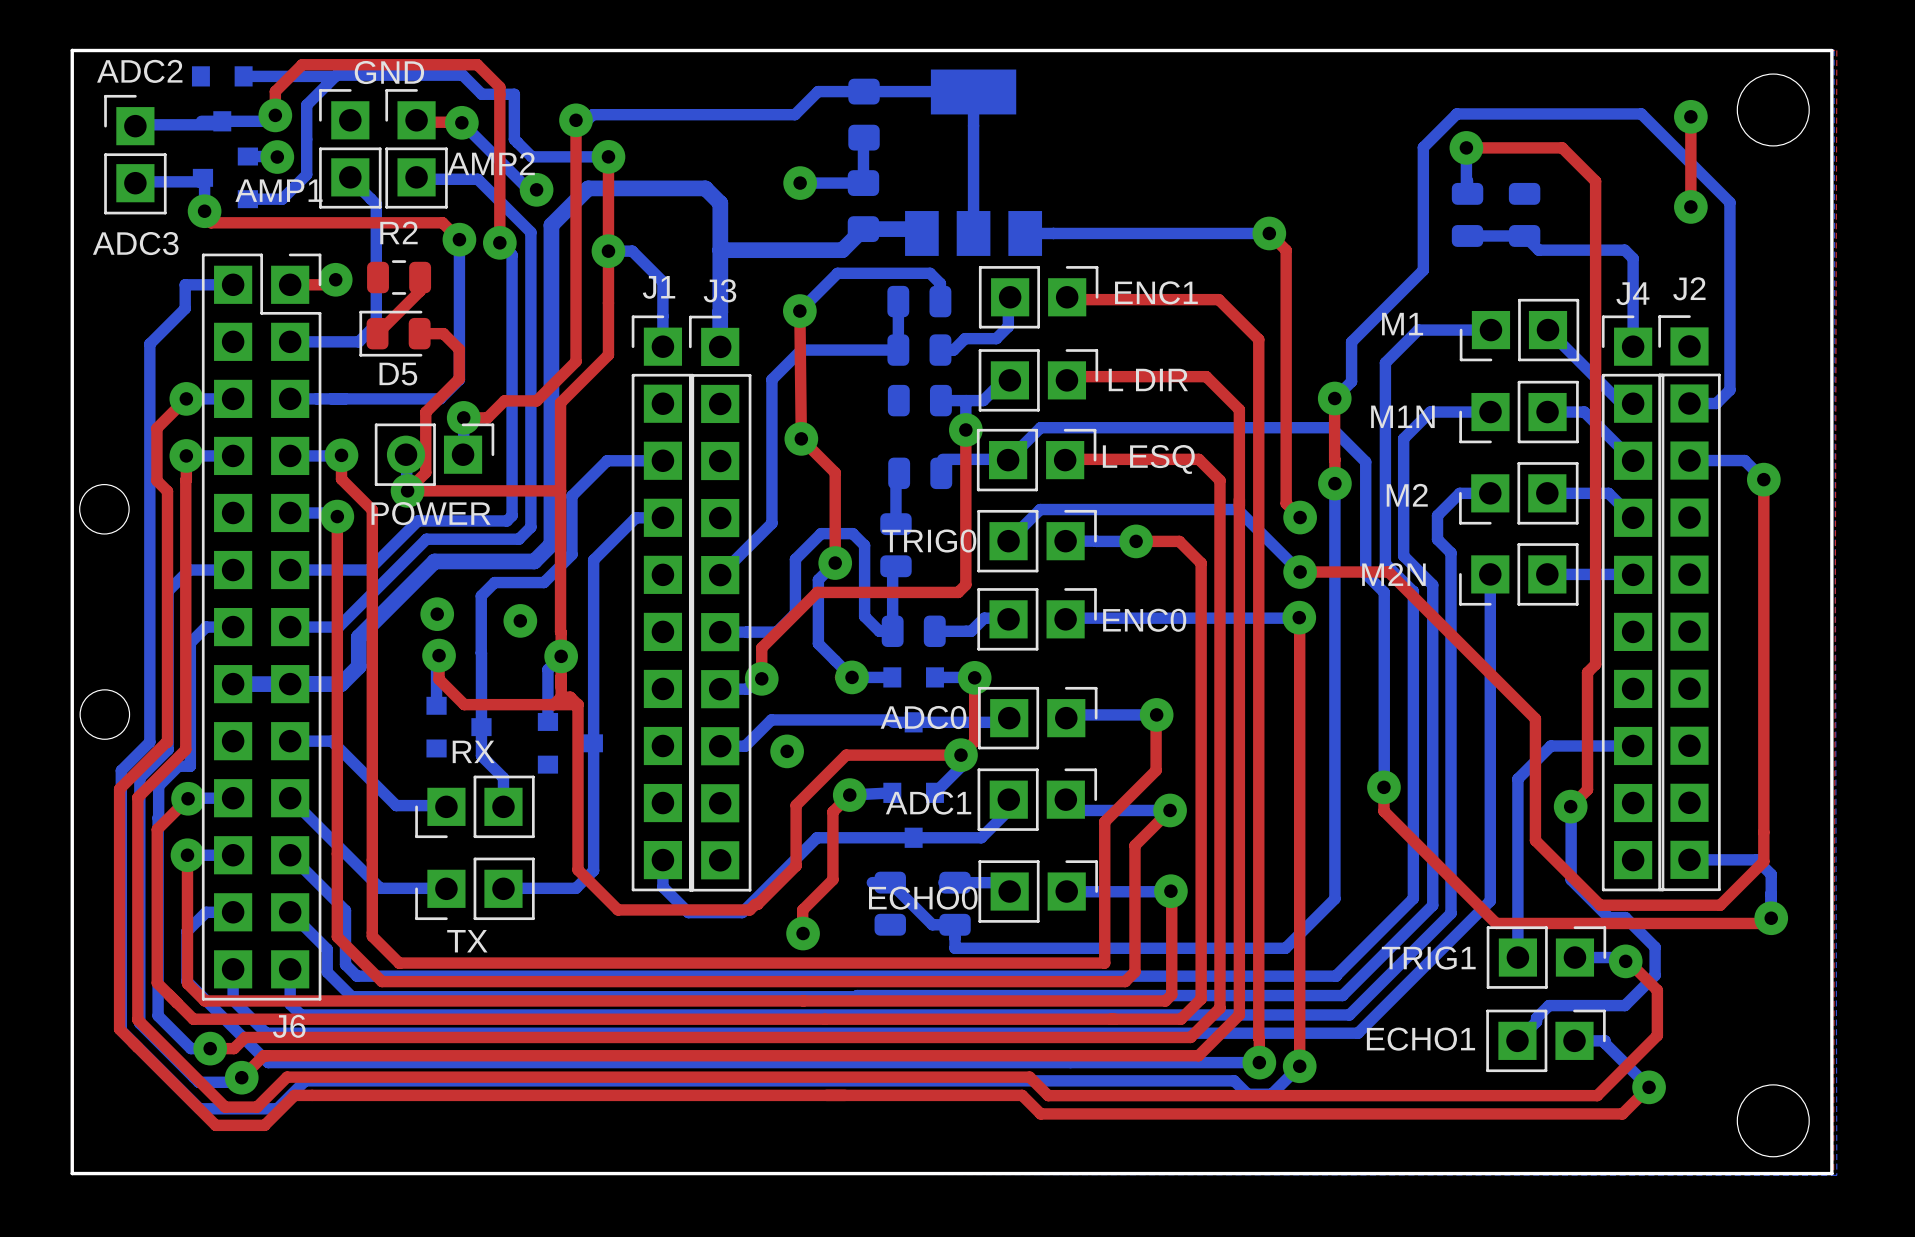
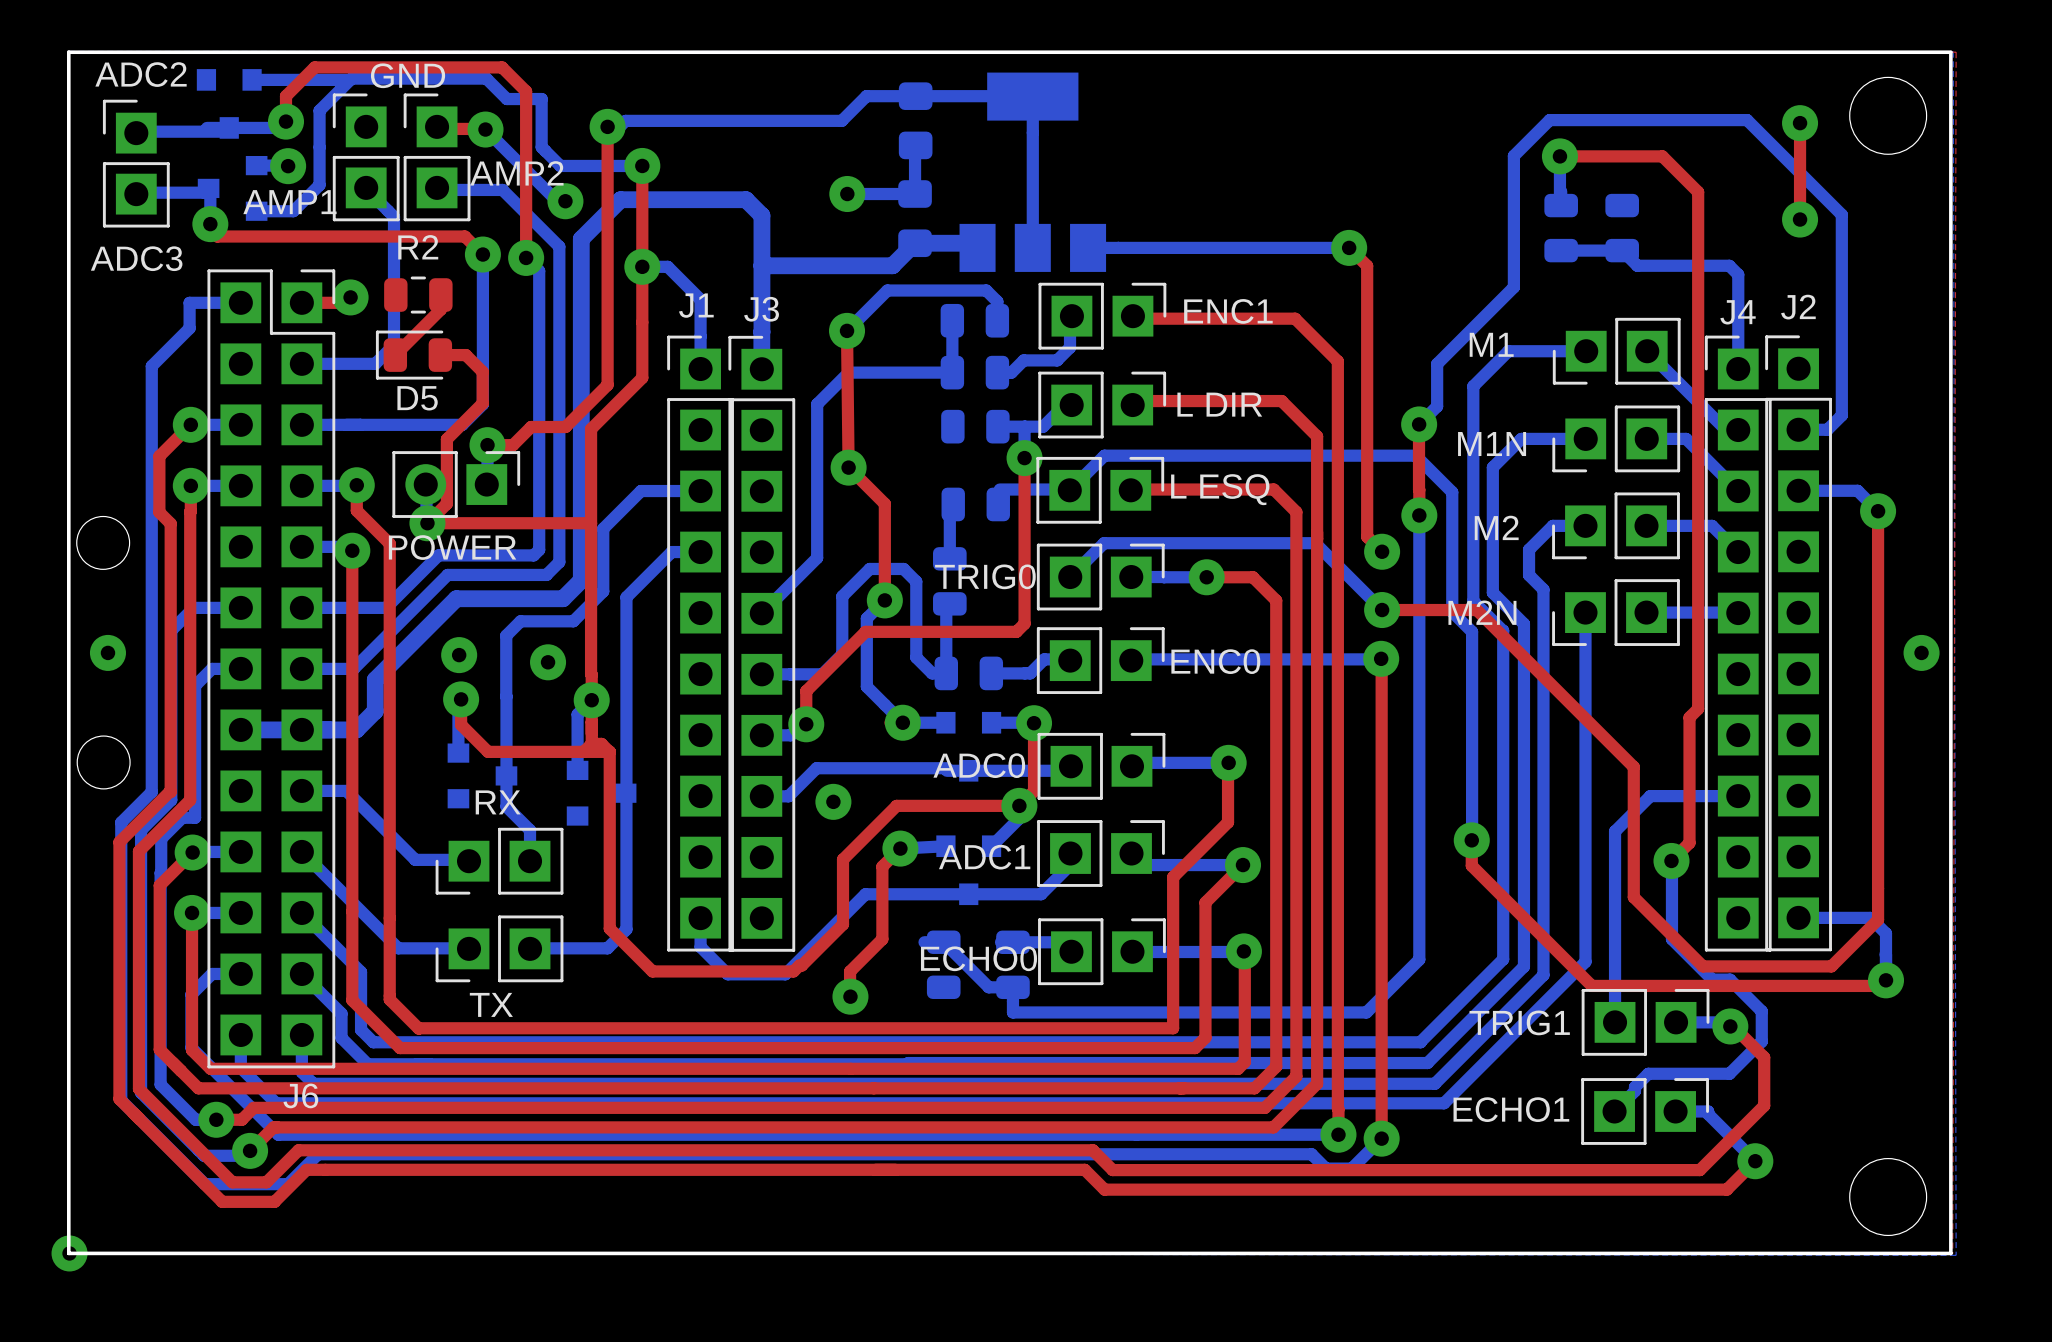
via: none -> (107, 652)
via: none -> (1921, 652)
via: none -> (69, 1253)

